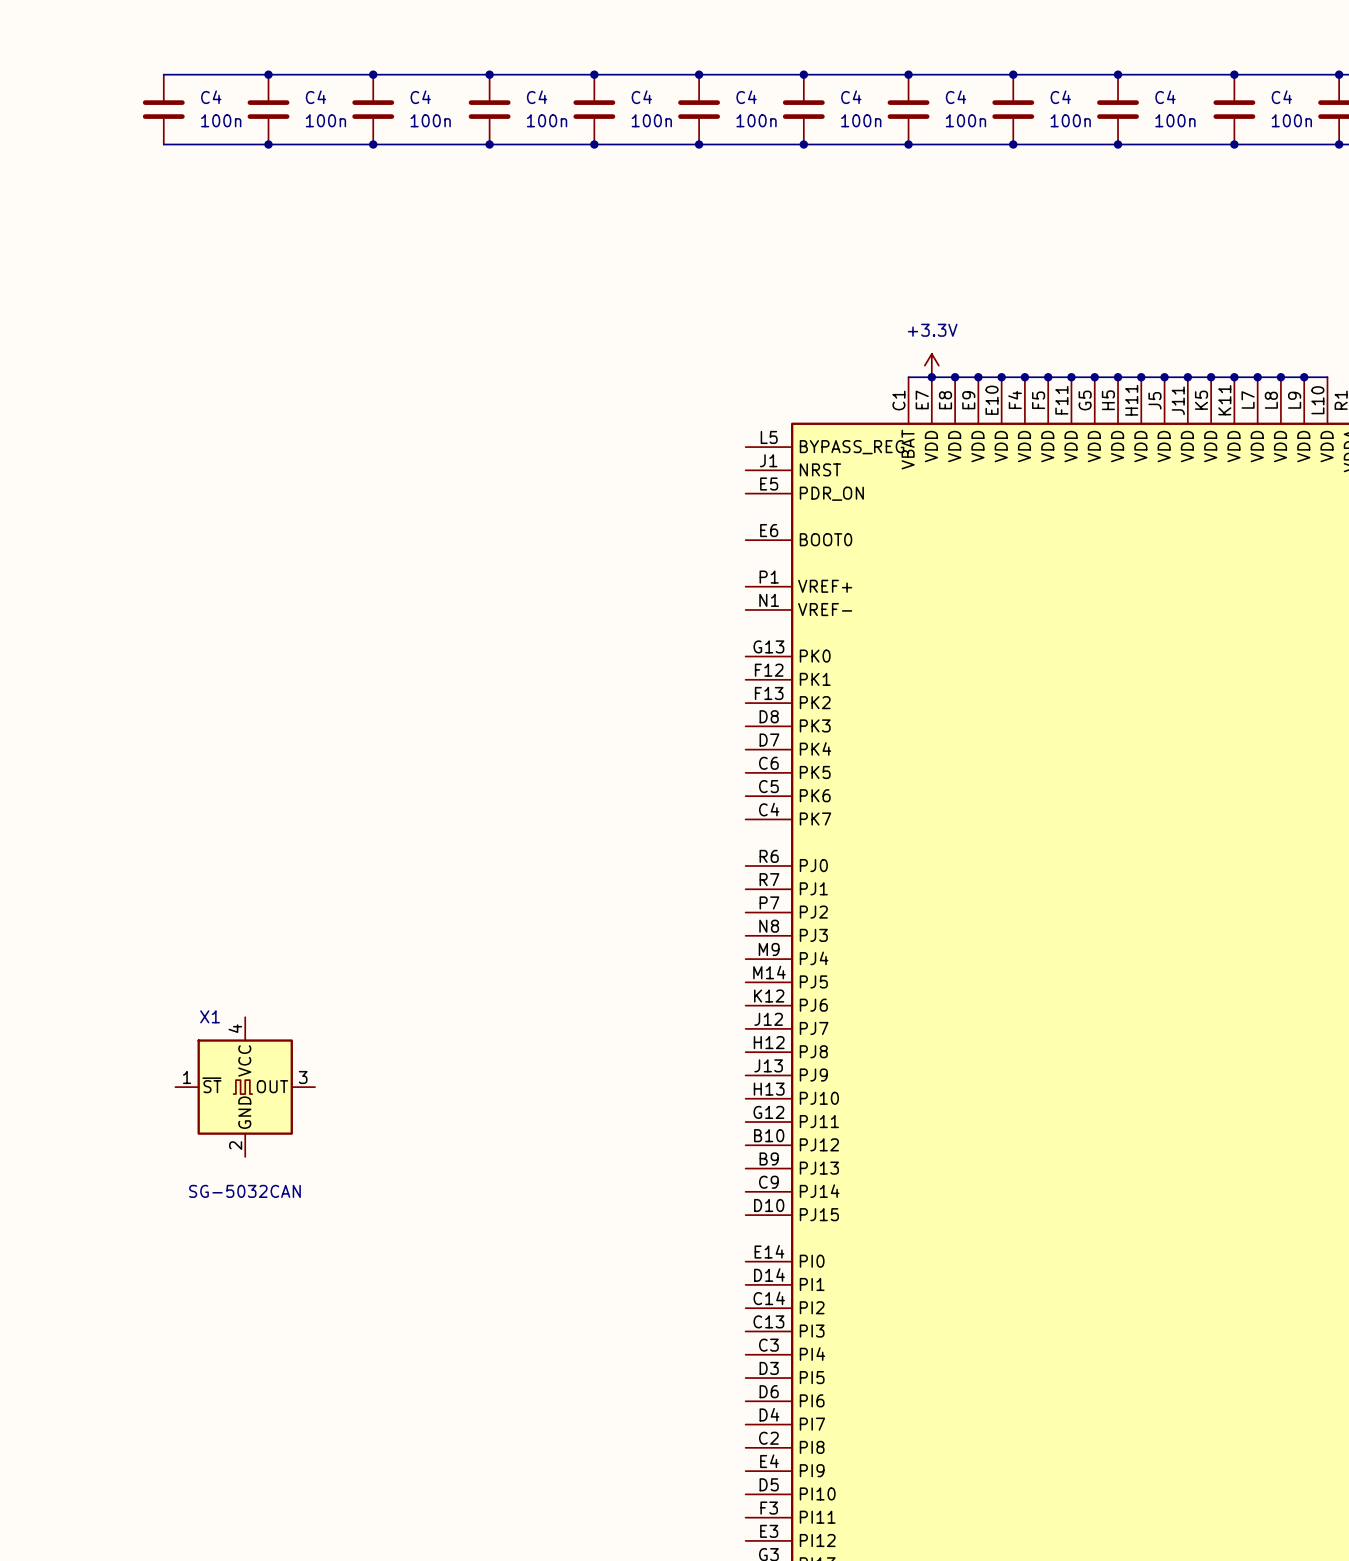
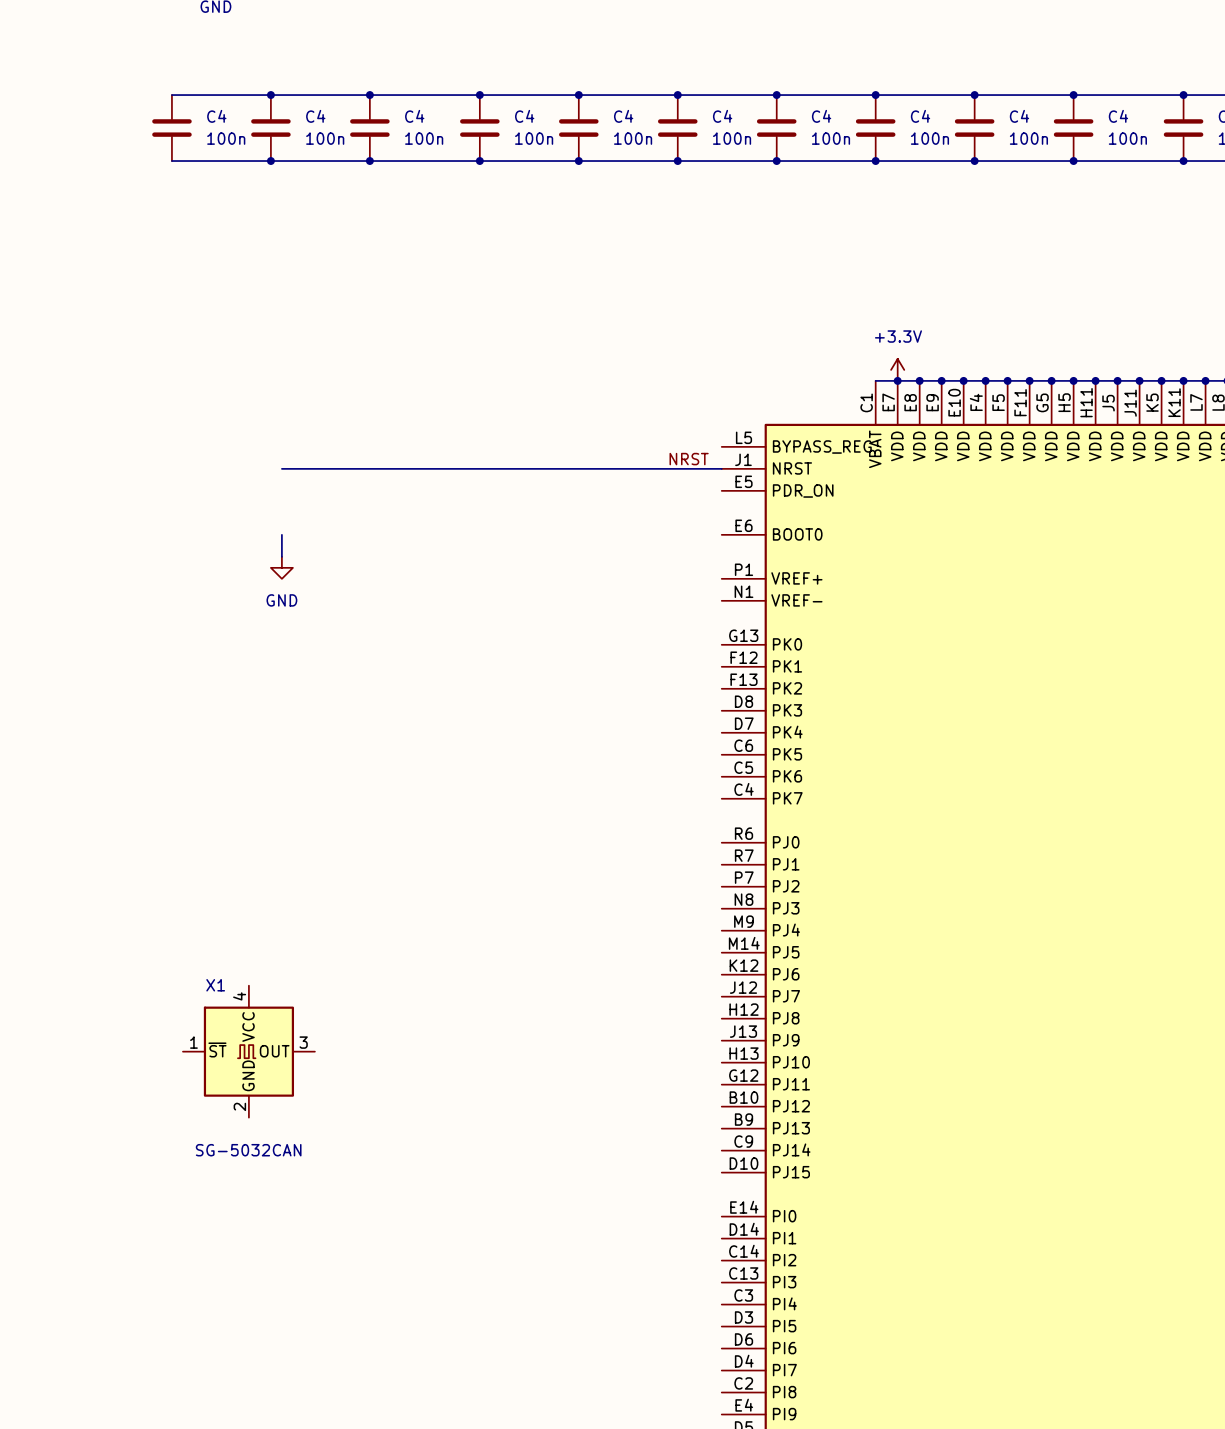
label: none -> NRST (689, 459)
wire: none -> (281, 468) (721, 468)
wire: none -> (281, 534) (281, 556)
power symbol: none -> GND (281, 567)

